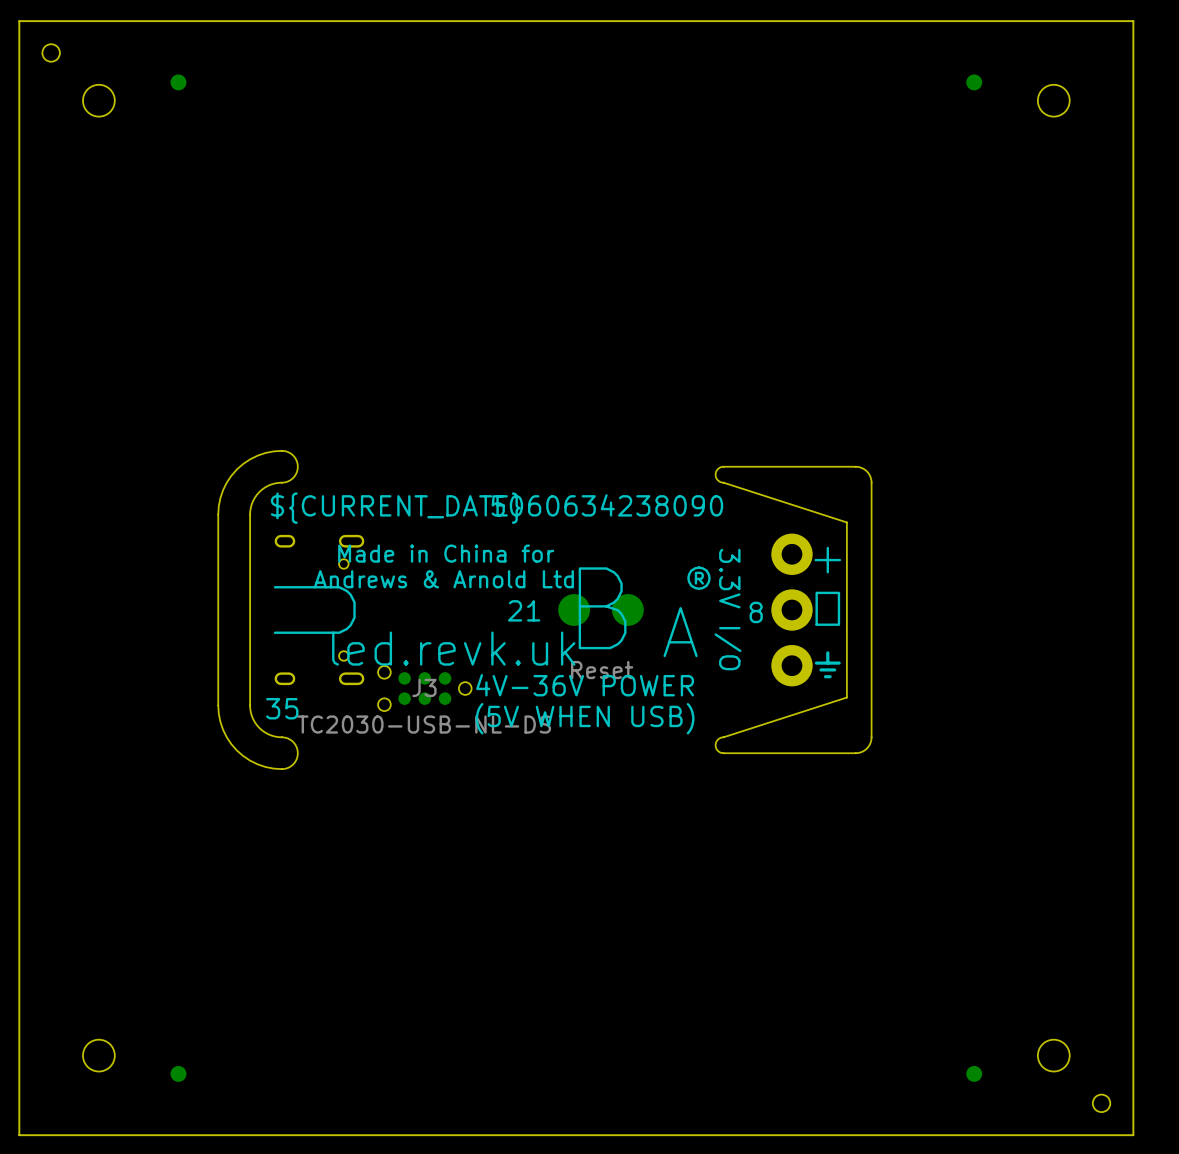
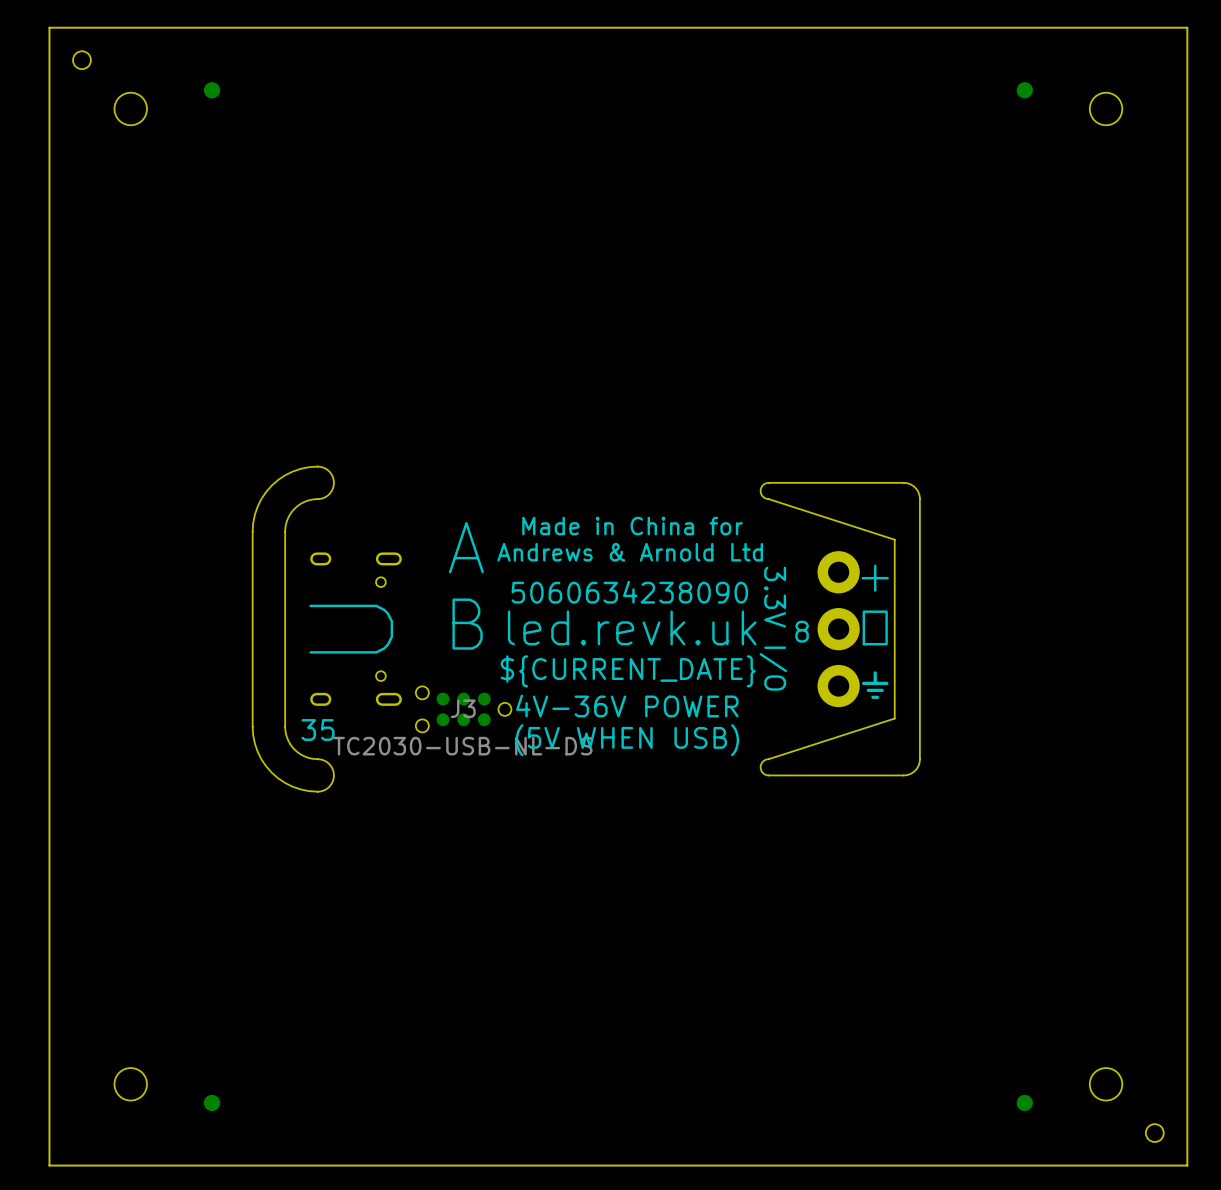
text position: 5060634238090 (607, 505) -> 5060634238090 (629, 592)
text position: ${CURRENT_DATE} (395, 508) -> ${CURRENT_DATE} (628, 671)
text position: Made in China for (446, 553) -> Made in China for (632, 526)
text: ® (698, 578) -> none
text position: Andrews & Arnold Ltd (443, 579) -> Andrews & Arnold Ltd (630, 552)
text: none -> B (467, 624)
part: Reset (601, 609) -> none
text: 21 (524, 610) -> none
text position: A (680, 632) -> A (466, 547)
text position: led.revk.uk (453, 648) -> led.revk.uk (632, 627)

